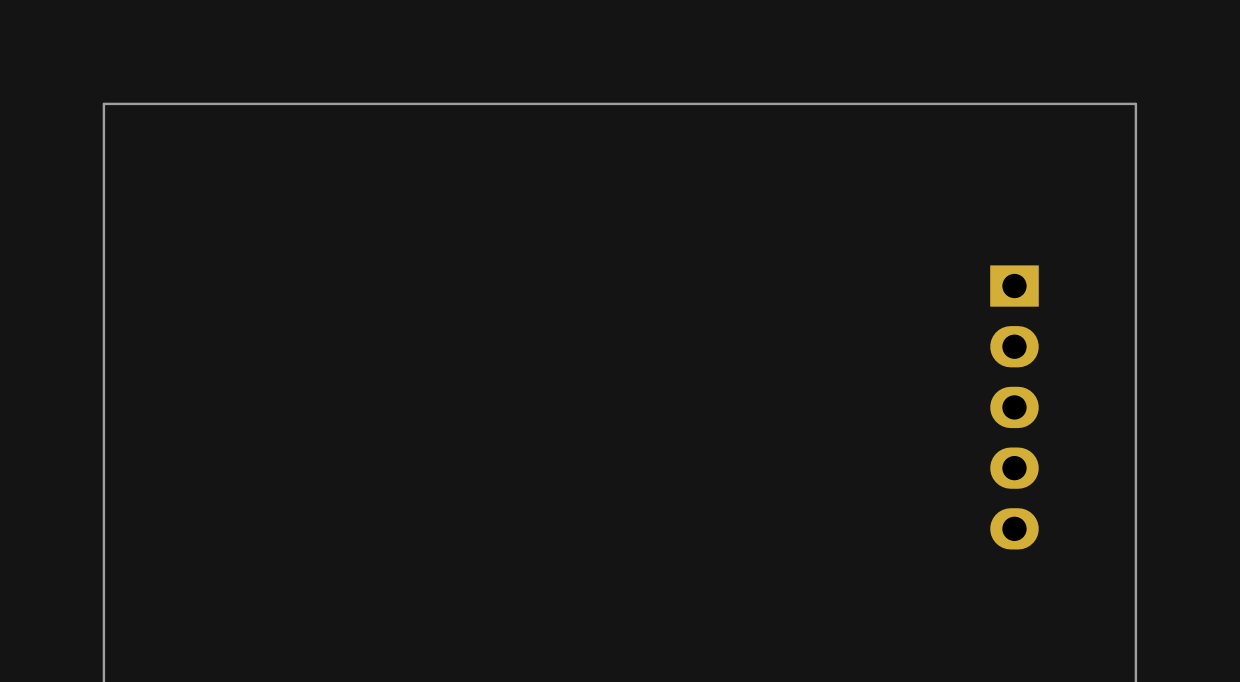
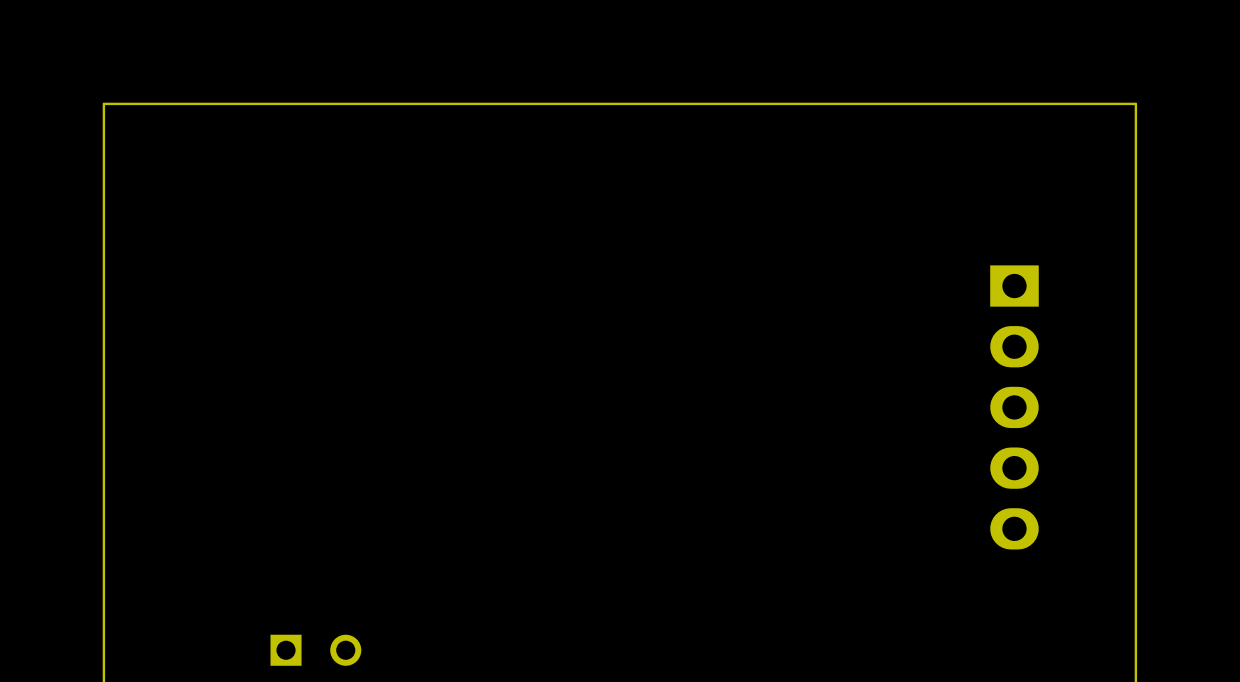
part: none -> (315, 650)

